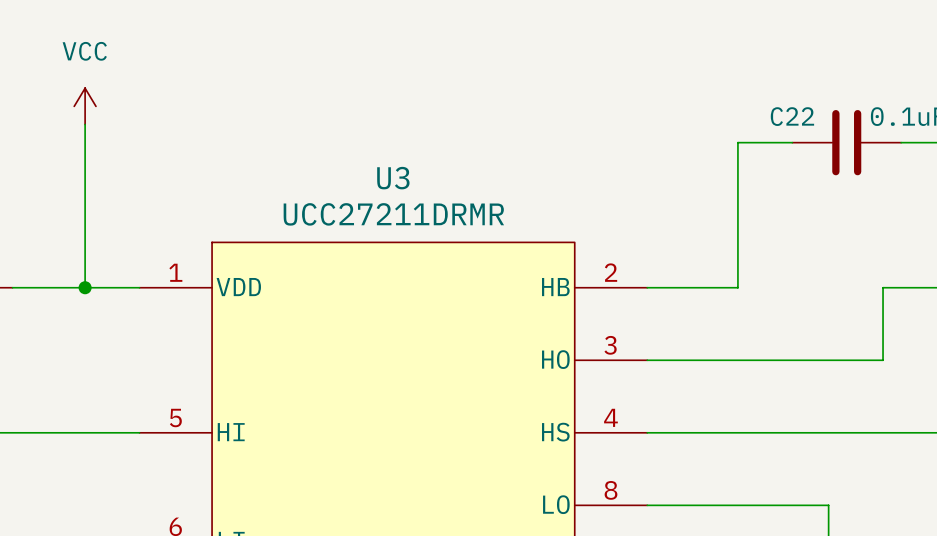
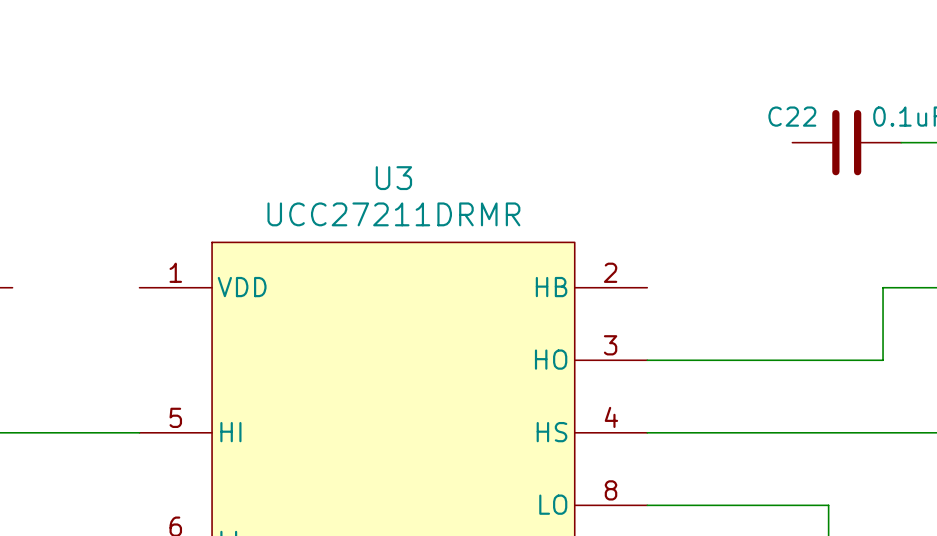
power symbol: VCC (85, 106) -> none
wire: (85, 124) (85, 287) -> none
wire: (792, 142) (737, 142) (737, 287) (647, 287) -> none
wire: (12, 287) (139, 287) -> none
junction: (85, 287) -> none

